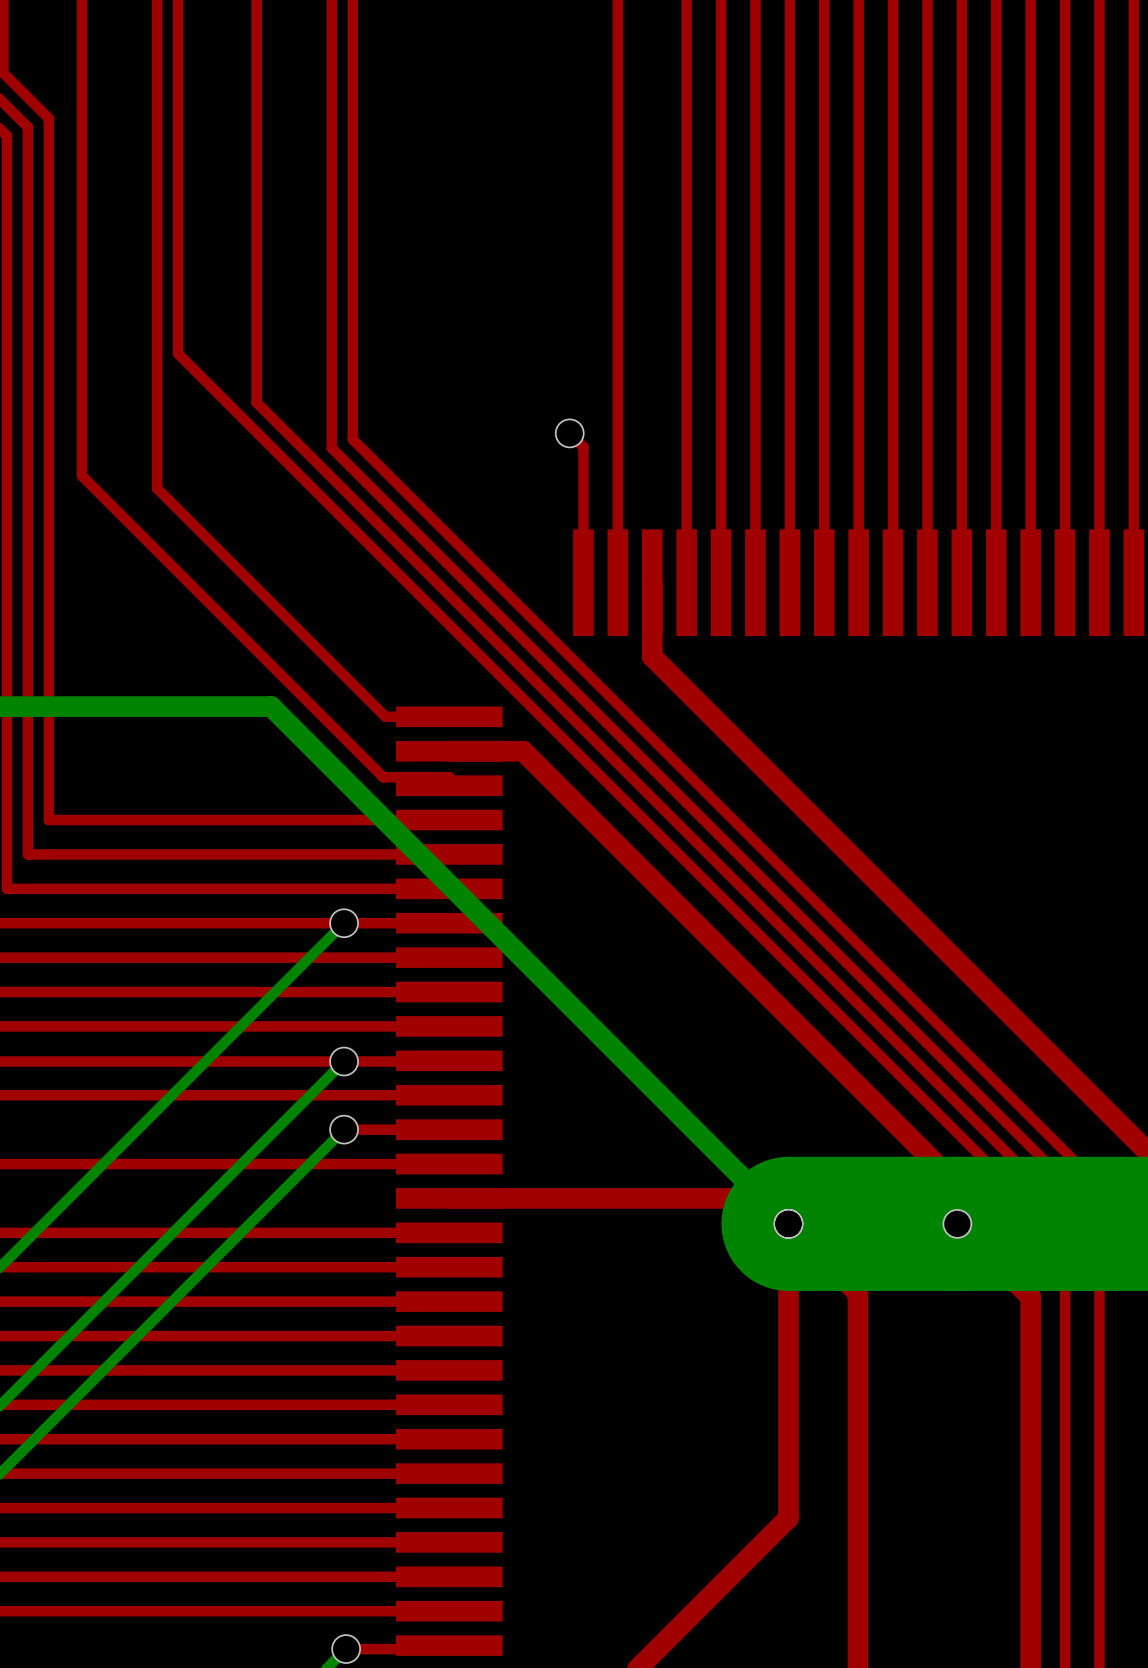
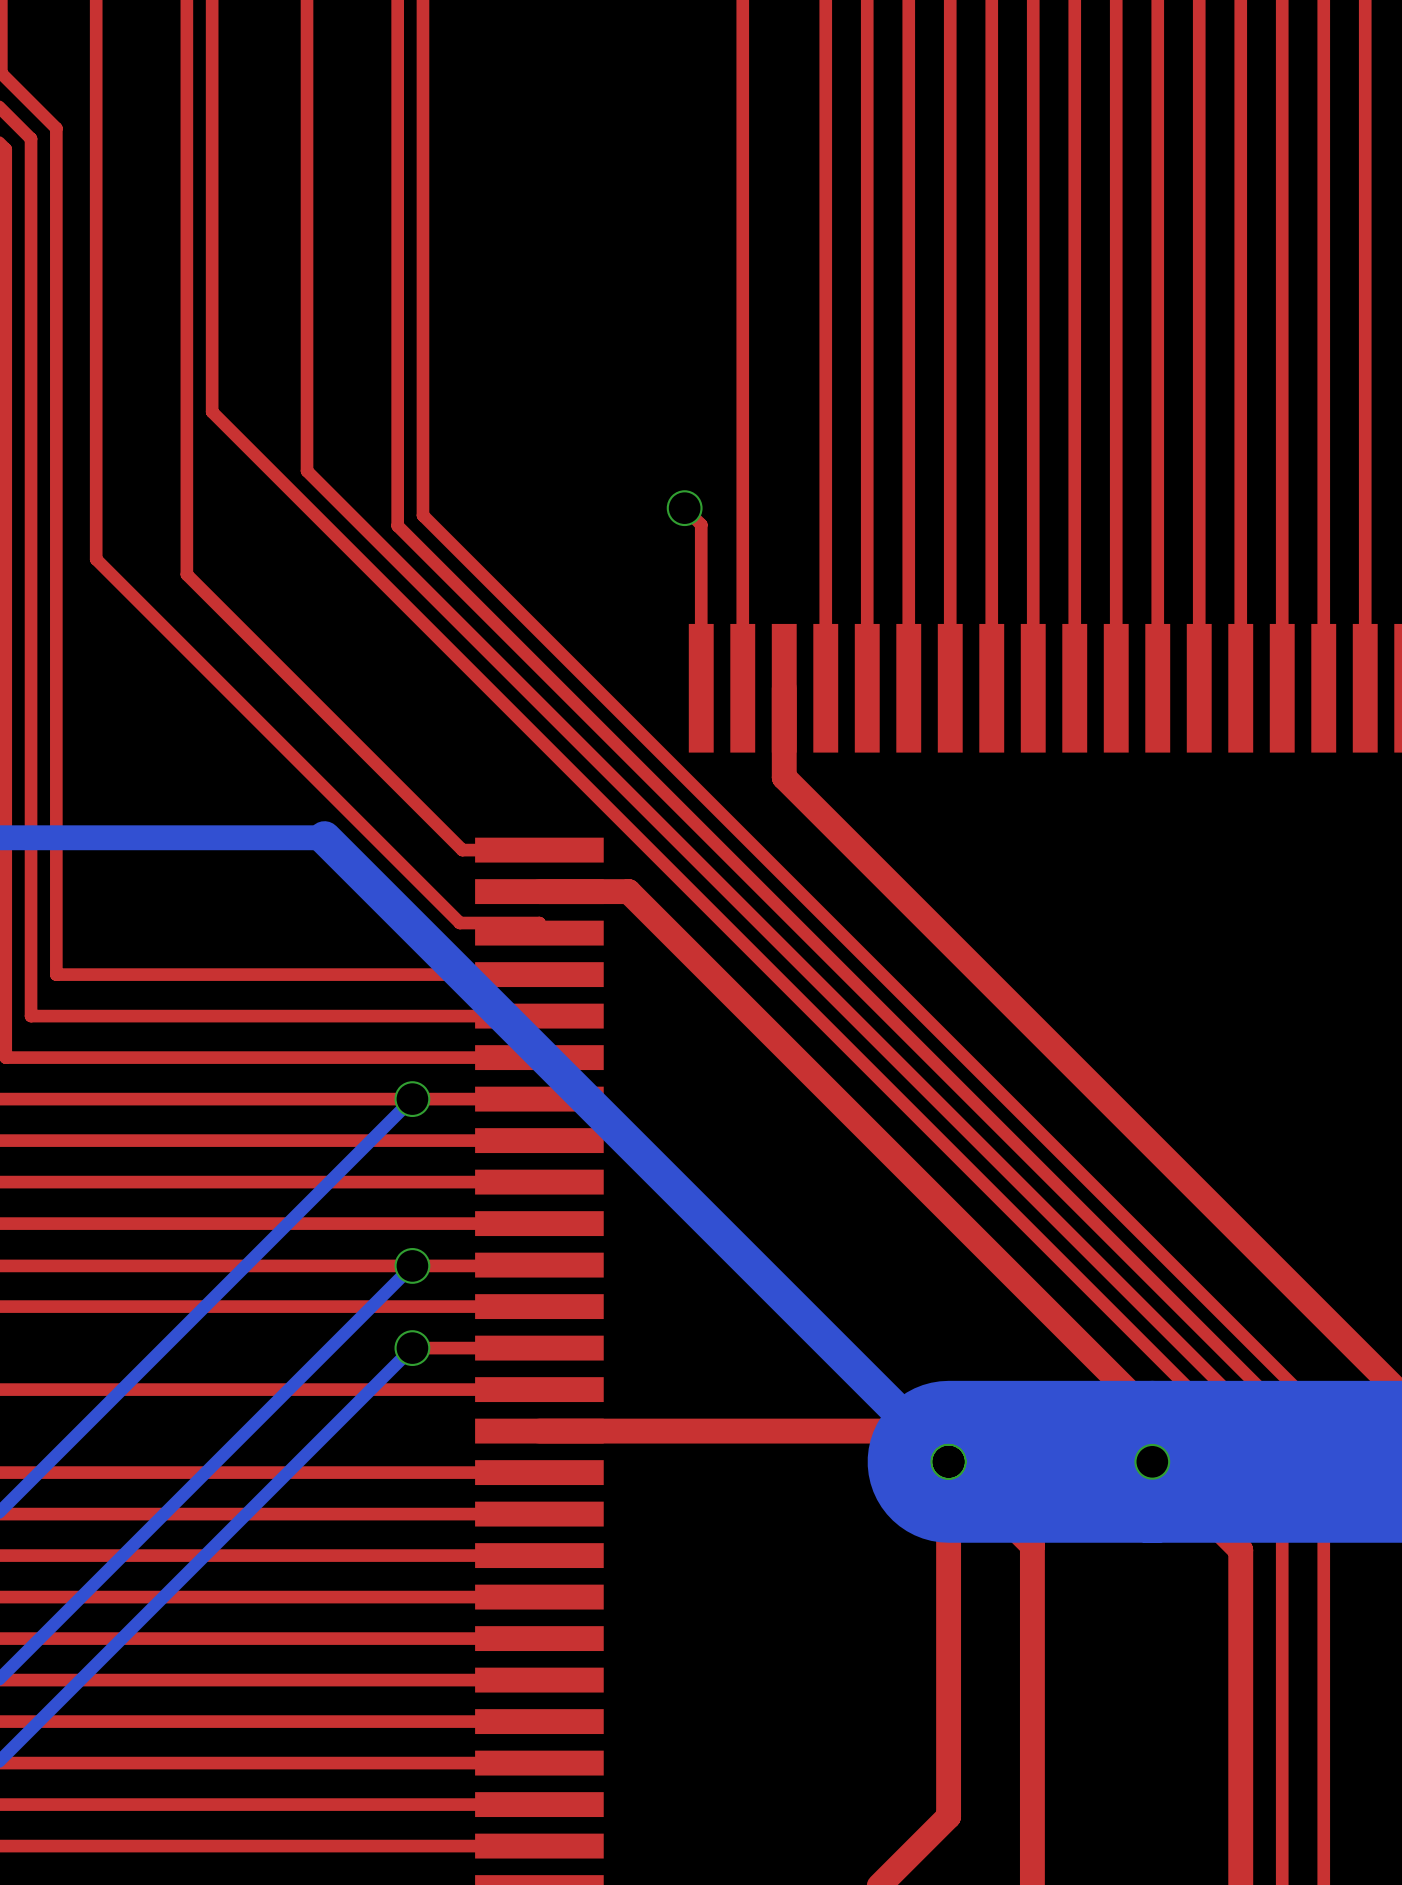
bottom track width: thin (271, 706) (788, 1223) -> thick (324, 837) (948, 1461)

